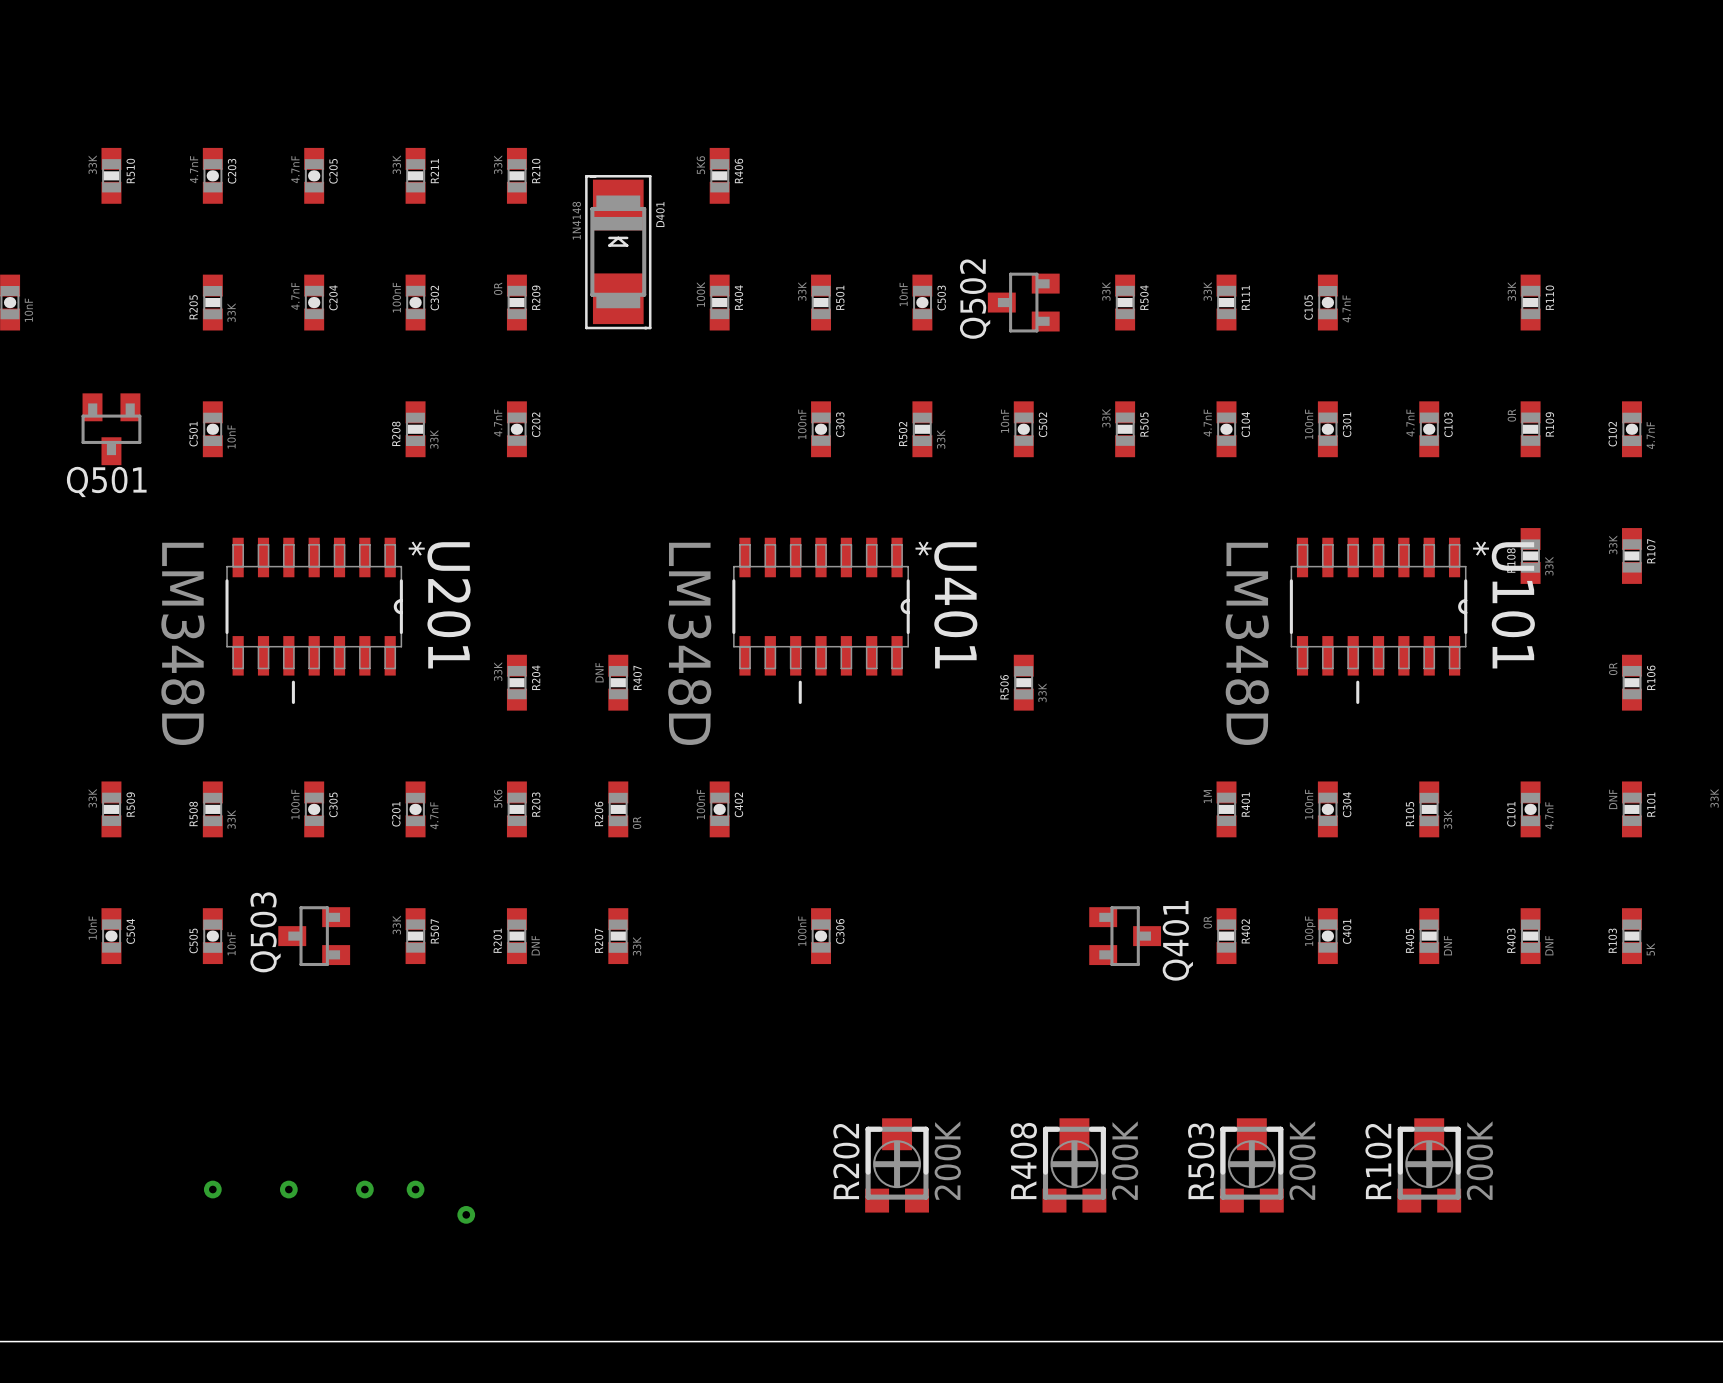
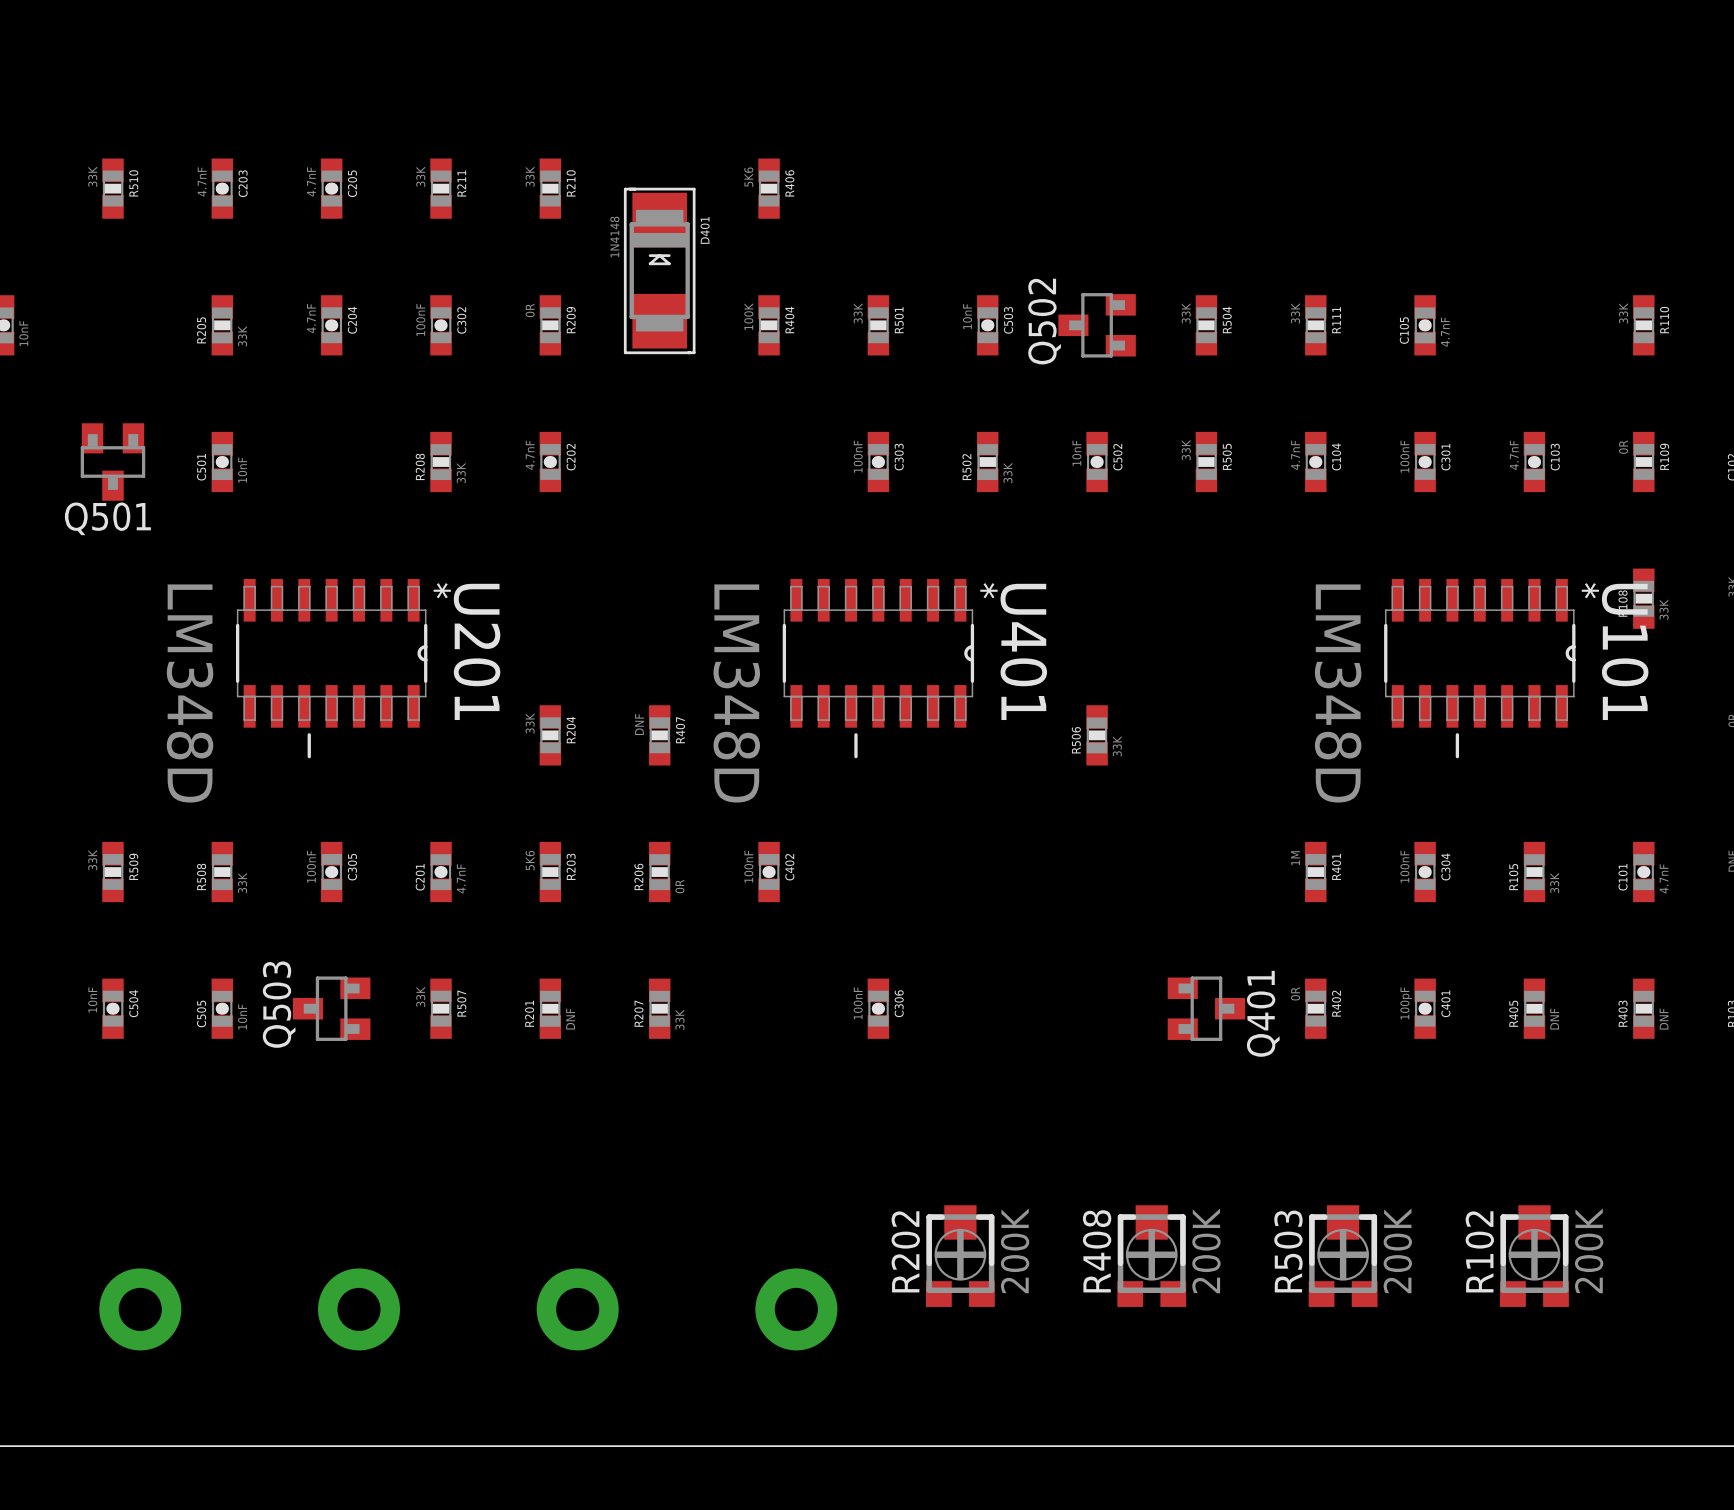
part: (212, 1189) -> none
part: (288, 1189) -> none
part: (364, 1189) -> none
part: (415, 1189) -> none
part: none -> (140, 1309)
part: none -> (359, 1309)
part: (466, 1214) -> none
part: none -> (577, 1309)
part: none -> (796, 1309)

